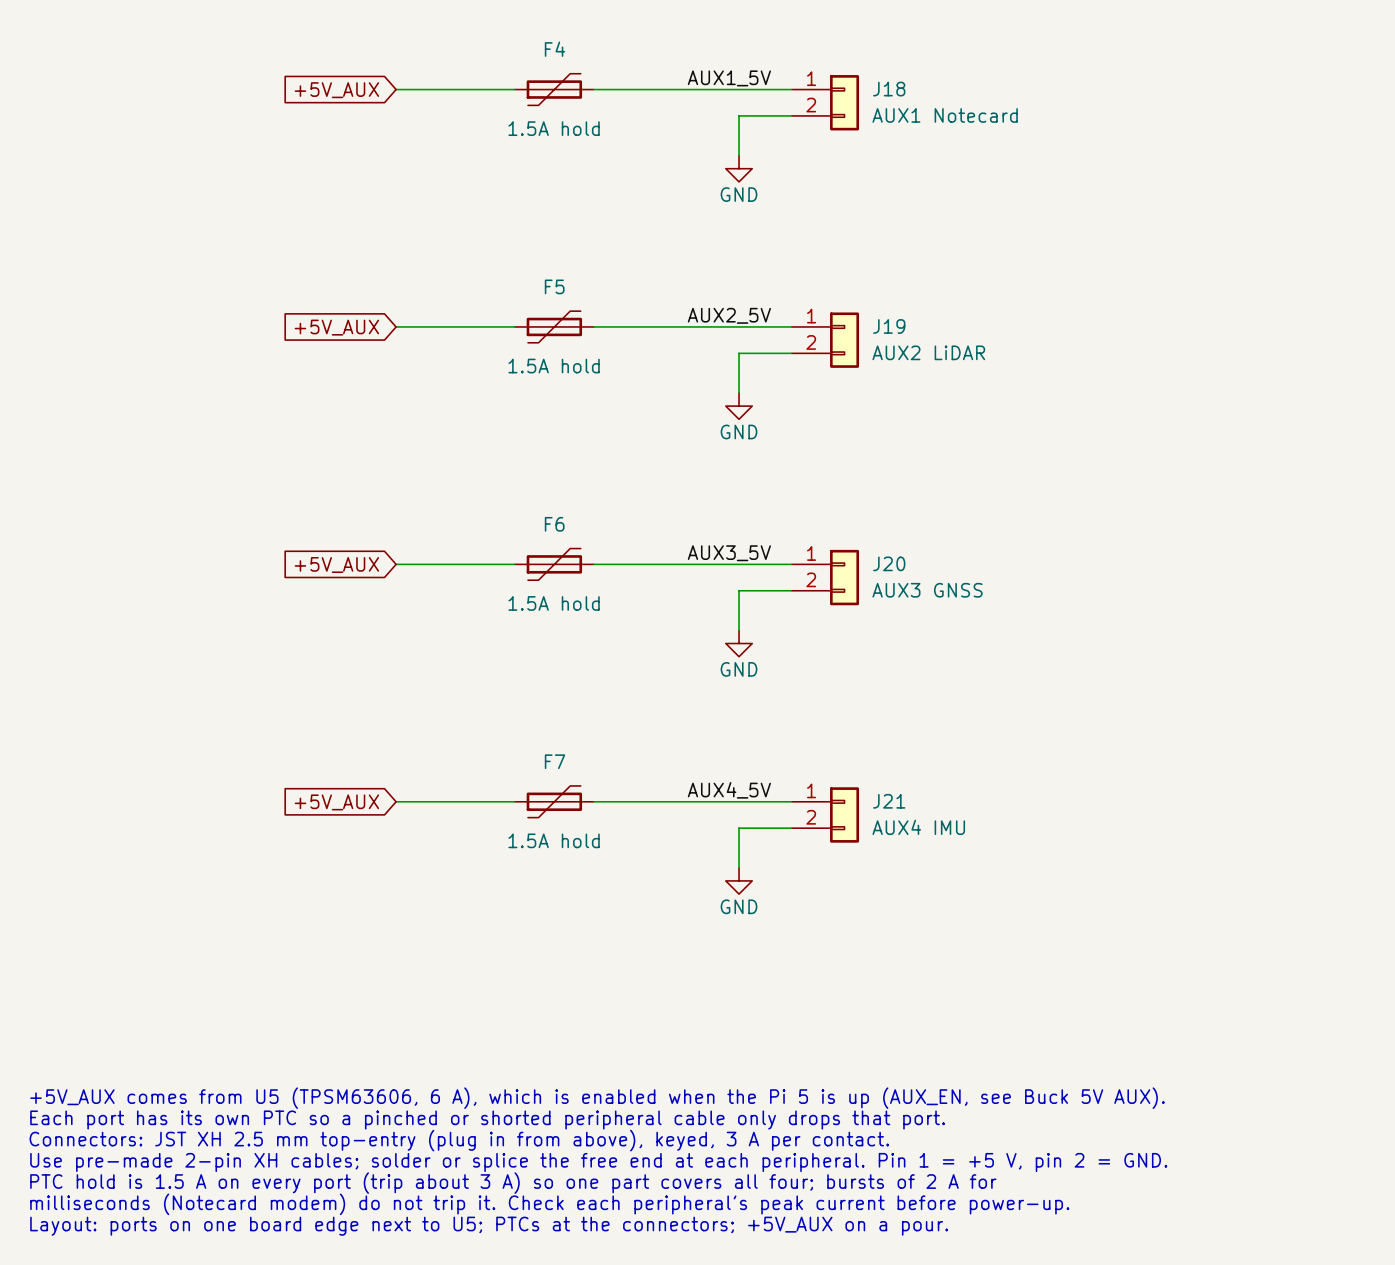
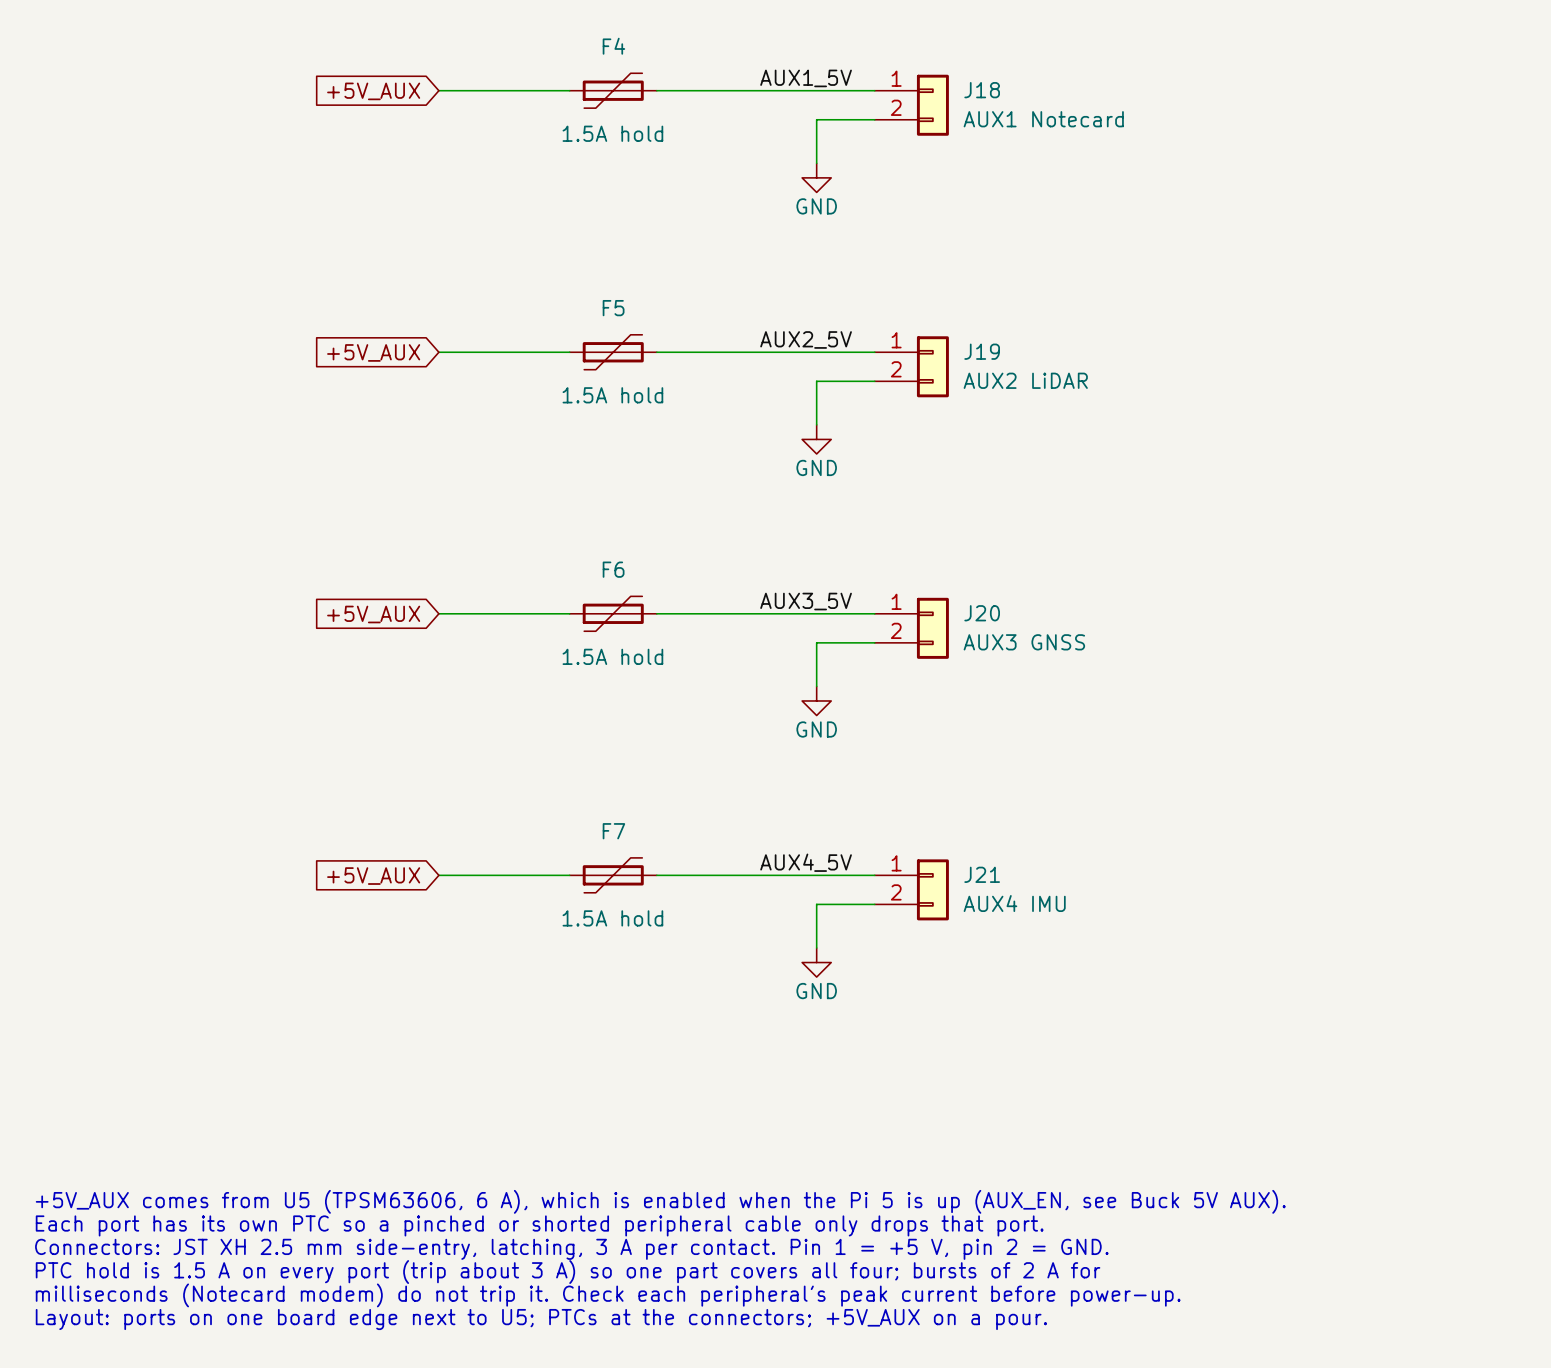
text: Connectors: JST XH 2.5 mm top-entry (plug in from above), keyed, 3 A per contact. (459, 1140) -> Connectors: JST XH 2.5 mm side-entry, latching, 3 A per contact. Pin 1 = +5 V, pin 2 = GND. (571, 1249)
text: Use pre-made 2-pin XH cables; solder or splice the free end at each peripheral. Pin 1 = +5 V, pin 2 = GND. (598, 1162) -> PTC hold is 1.5 A on every port (trip about 3 A) so one part covers all four; bursts of 2 A for (568, 1272)
text: PTC hold is 1.5 A on every port (trip about 3 A) so one part covers all four; bursts of 2 A for (513, 1183) -> milliseconds (Notecard modem) do not trip it. Check each peripheral's peak current before power-up. (608, 1295)
text: milliseconds (Notecard modem) do not trip it. Check each peripheral's peak current before power-up. (549, 1204) -> Layout: ports on one board edge next to U5; PTCs at the connectors; +5V_AUX on a pour. (541, 1319)
text: Layout: ports on one board edge next to U5; PTCs at the connectors; +5V_AUX on a pour. (489, 1226) -> none

